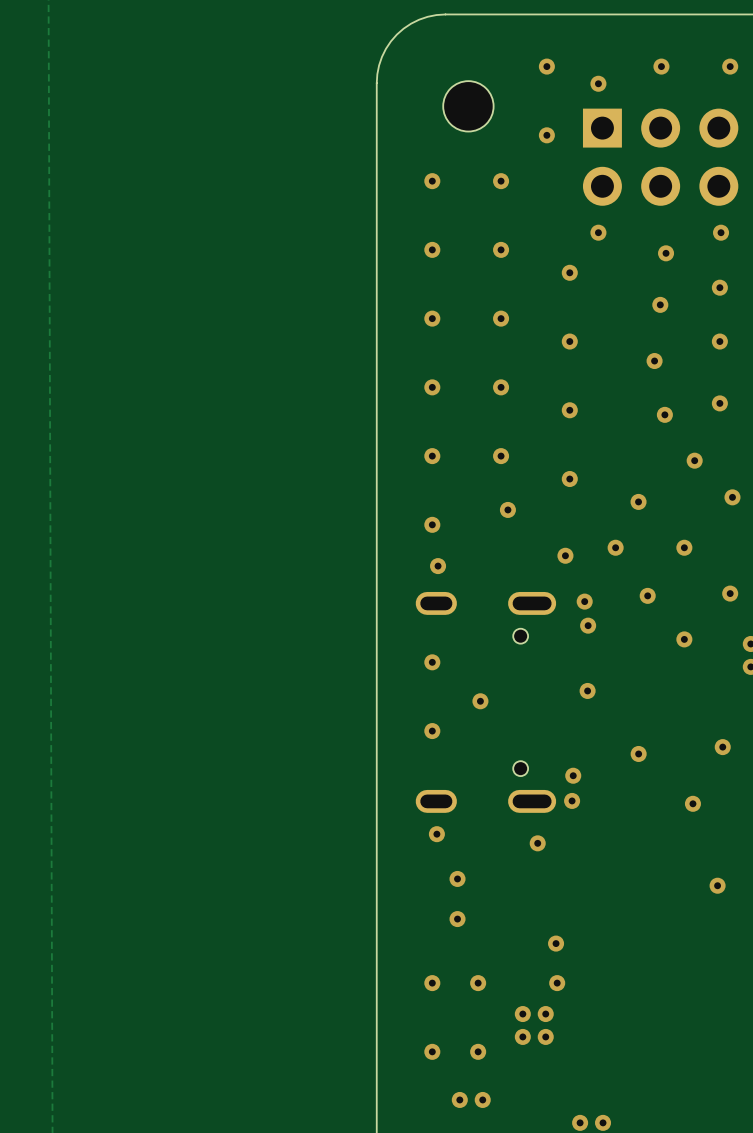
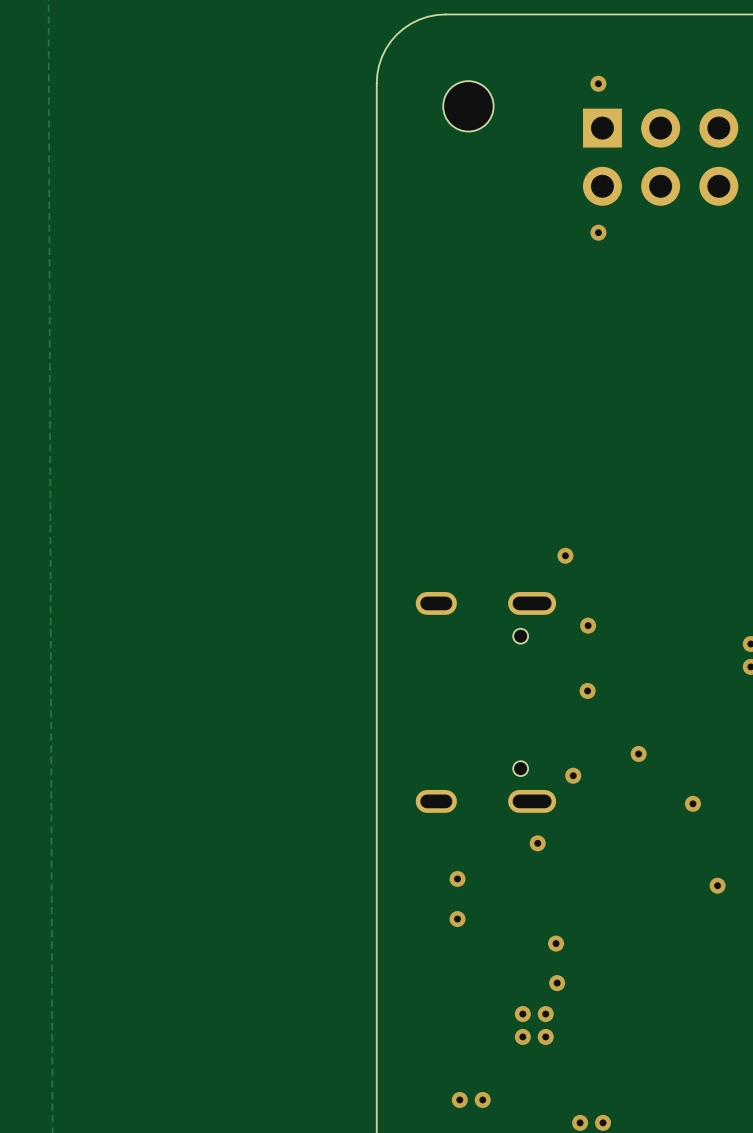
via: (546, 66) -> none
via: (661, 66) -> none
via: (730, 66) -> none
via: (546, 135) -> none
via: (432, 181) -> none
via: (501, 181) -> none
via: (721, 232) -> none
via: (432, 249) -> none
via: (501, 249) -> none
via: (666, 253) -> none
via: (569, 272) -> none
via: (719, 287) -> none
via: (660, 304) -> none
via: (432, 318) -> none
via: (501, 318) -> none
via: (569, 341) -> none
via: (719, 341) -> none
via: (654, 361) -> none
via: (432, 387) -> none
via: (501, 387) -> none
via: (719, 403) -> none
via: (569, 410) -> none
via: (664, 414) -> none
via: (432, 456) -> none
via: (501, 456) -> none
via: (694, 460) -> none
via: (569, 479) -> none
via: (732, 497) -> none
via: (638, 501) -> none
via: (507, 509) -> none
via: (432, 524) -> none
via: (615, 547) -> none
via: (684, 547) -> none
via: (438, 566) -> none
via: (730, 593) -> none
via: (647, 595) -> none
via: (584, 601) -> none
via: (684, 639) -> none
via: (432, 662) -> none
via: (480, 701) -> none
via: (432, 731) -> none
via: (722, 747) -> none
via: (572, 800) -> none
via: (436, 834) -> none
via: (432, 983) -> none
via: (478, 983) -> none
via: (432, 1051) -> none
via: (478, 1051) -> none

